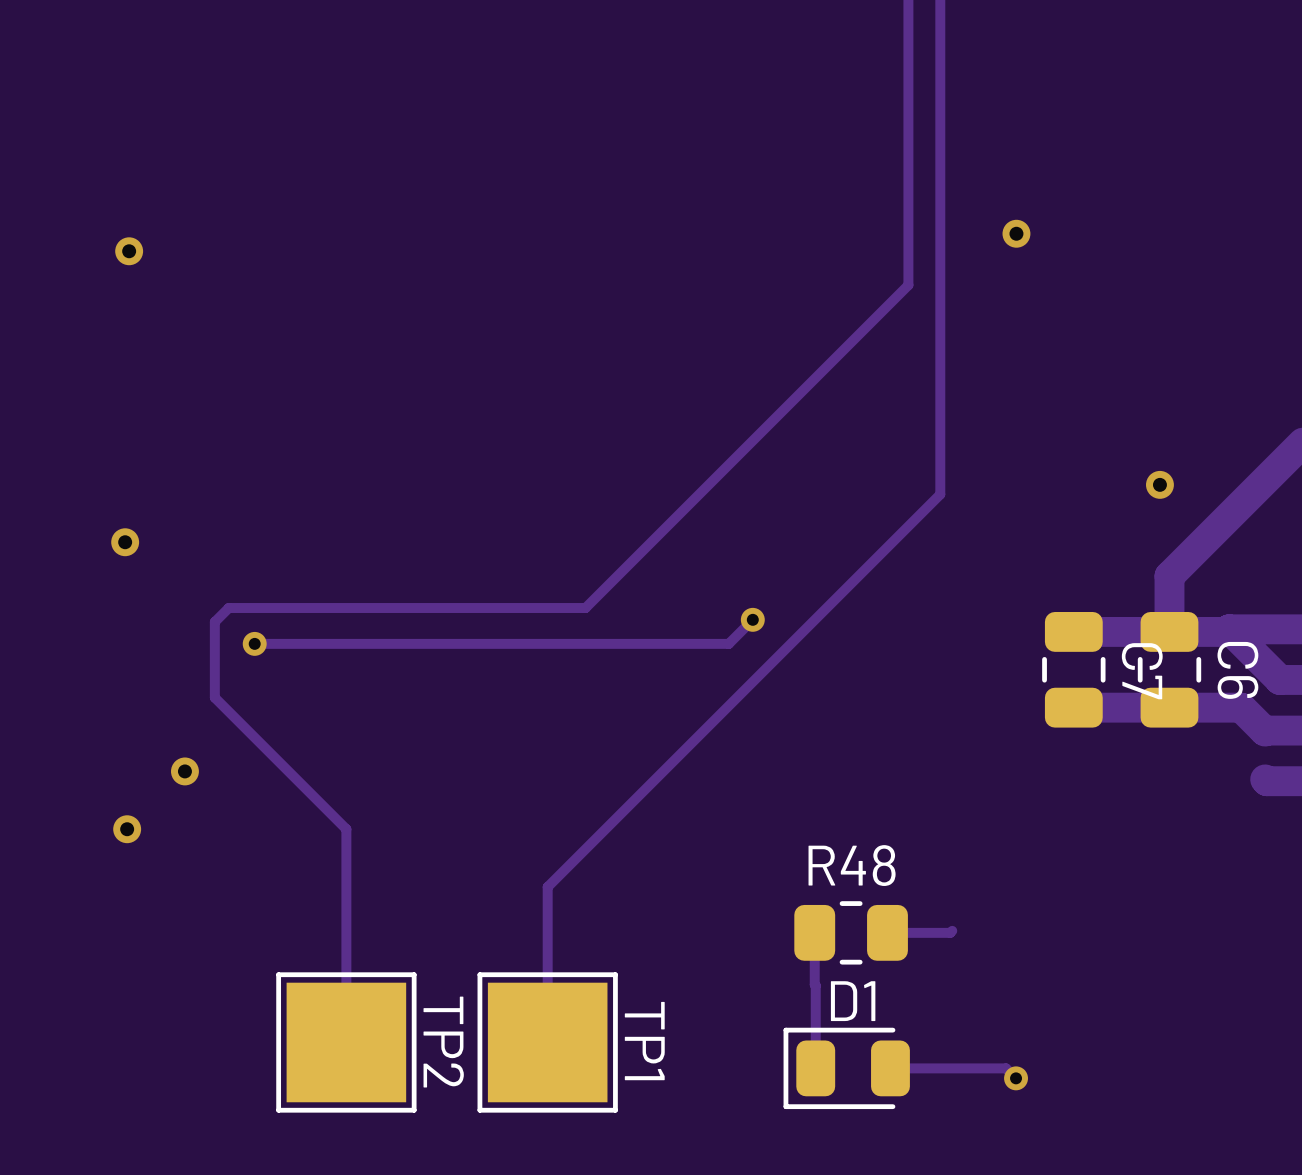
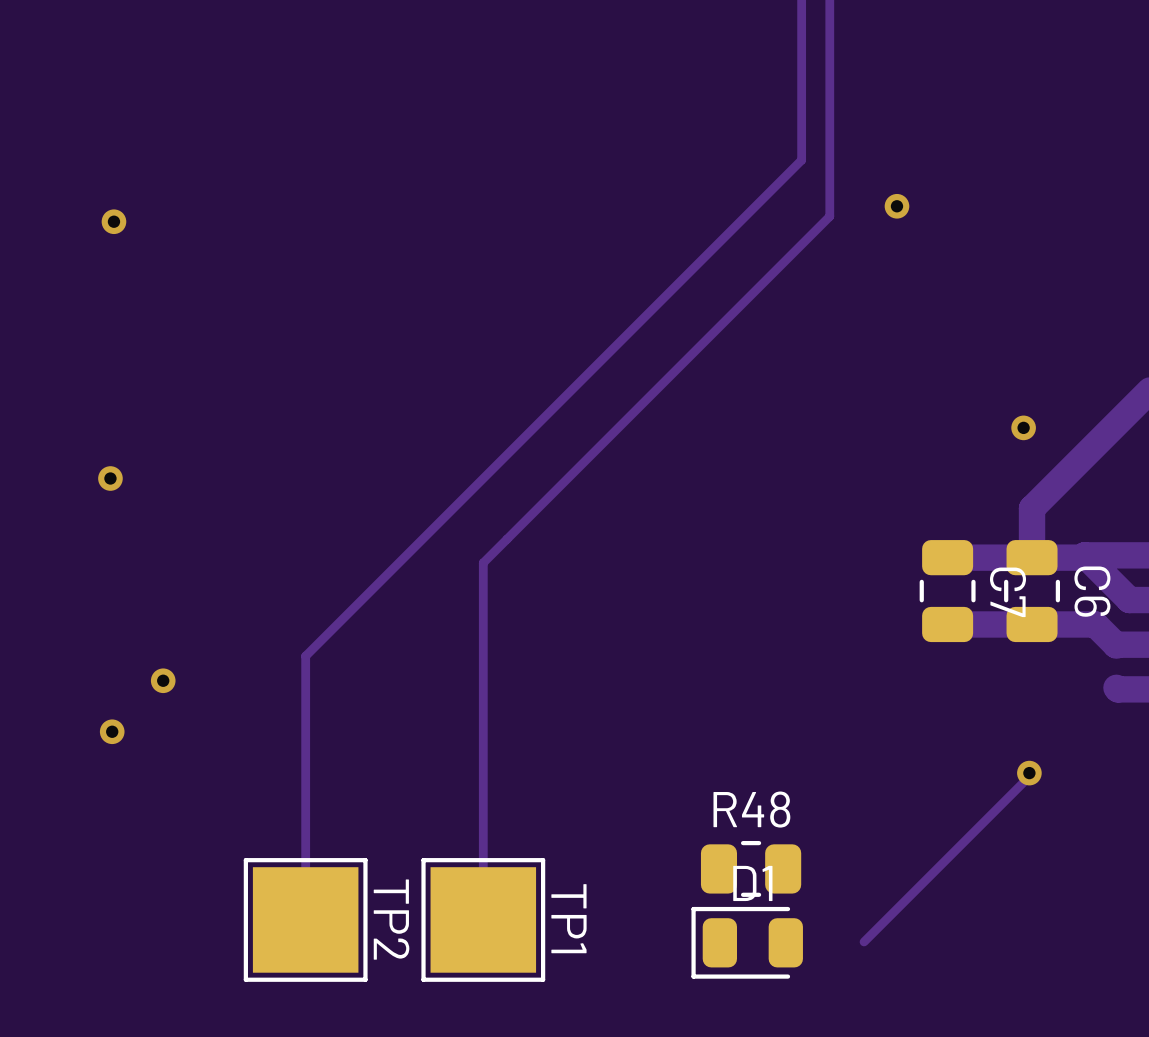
track: (908, 181) (908, 285) (585, 608) (228, 608) (214, 621) (214, 697) (346, 829) -> (801, 160) (305, 656) (305, 731)
track: (940, 245) (940, 494) (547, 887) -> (829, 216) (483, 562) (483, 782)
track: (752, 619) (728, 643) (254, 643) -> none
via: (752, 619) -> none
via: (254, 643) -> none
track: none -> (1029, 773) (1029, 776) (864, 941)
via: none -> (1029, 773)
track: (952, 930) (950, 932) (887, 932) -> none
track: (814, 932) (815, 1068) -> none
R48 position: (851, 932) -> (751, 868)
track: (890, 1068) (1006, 1068) (1016, 1078) -> none
via: (1016, 1078) -> none

